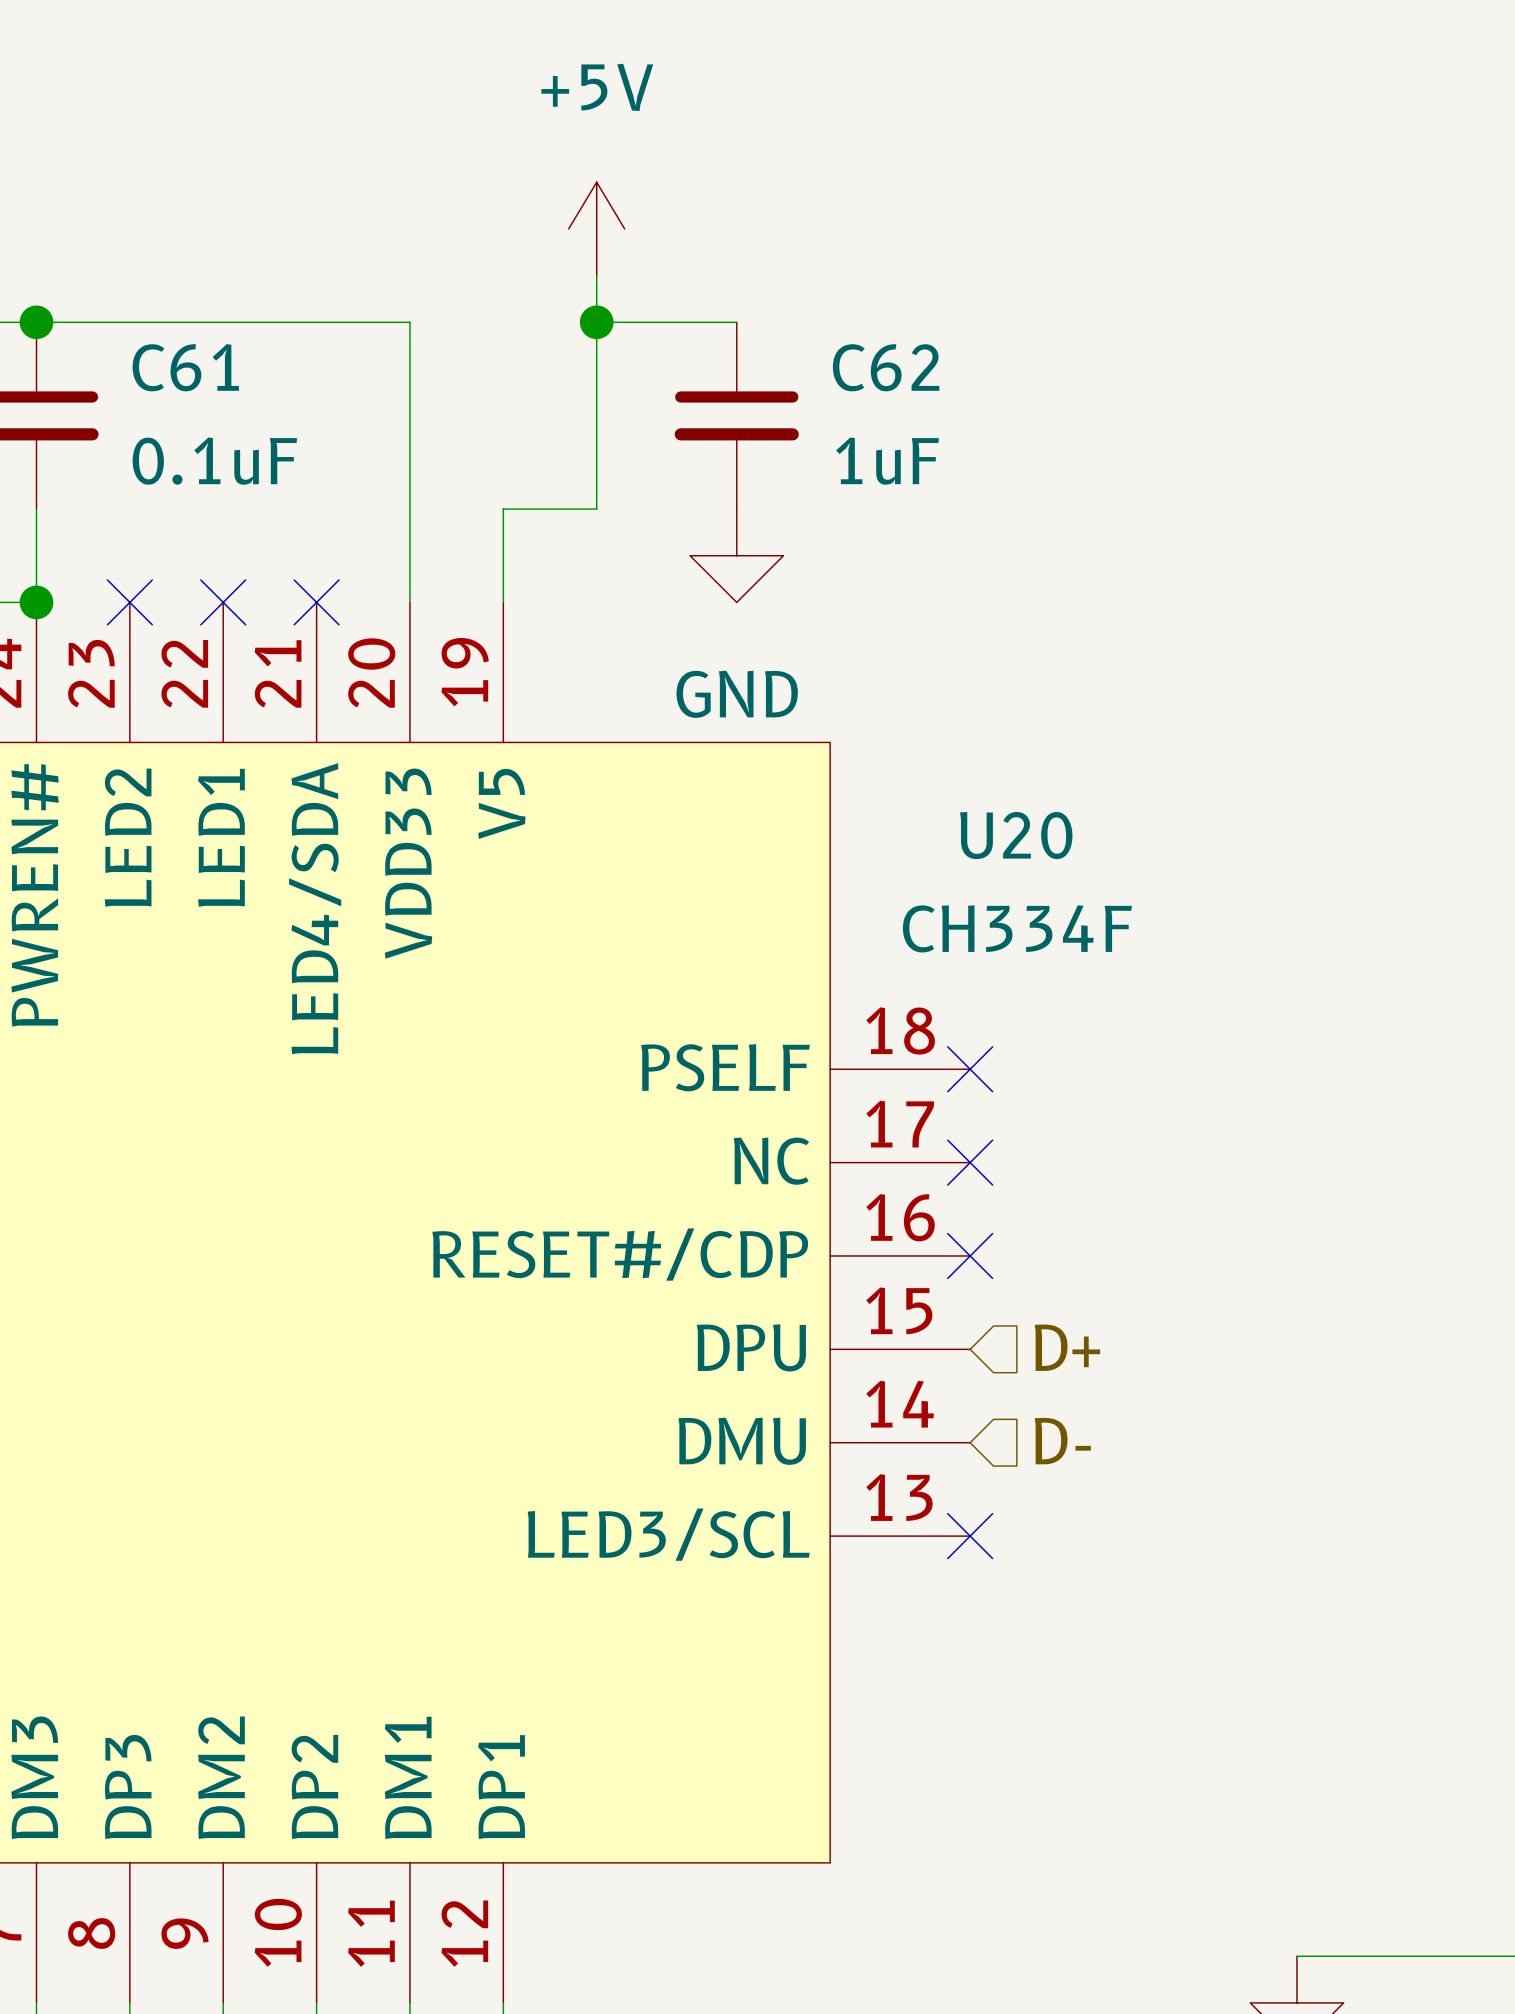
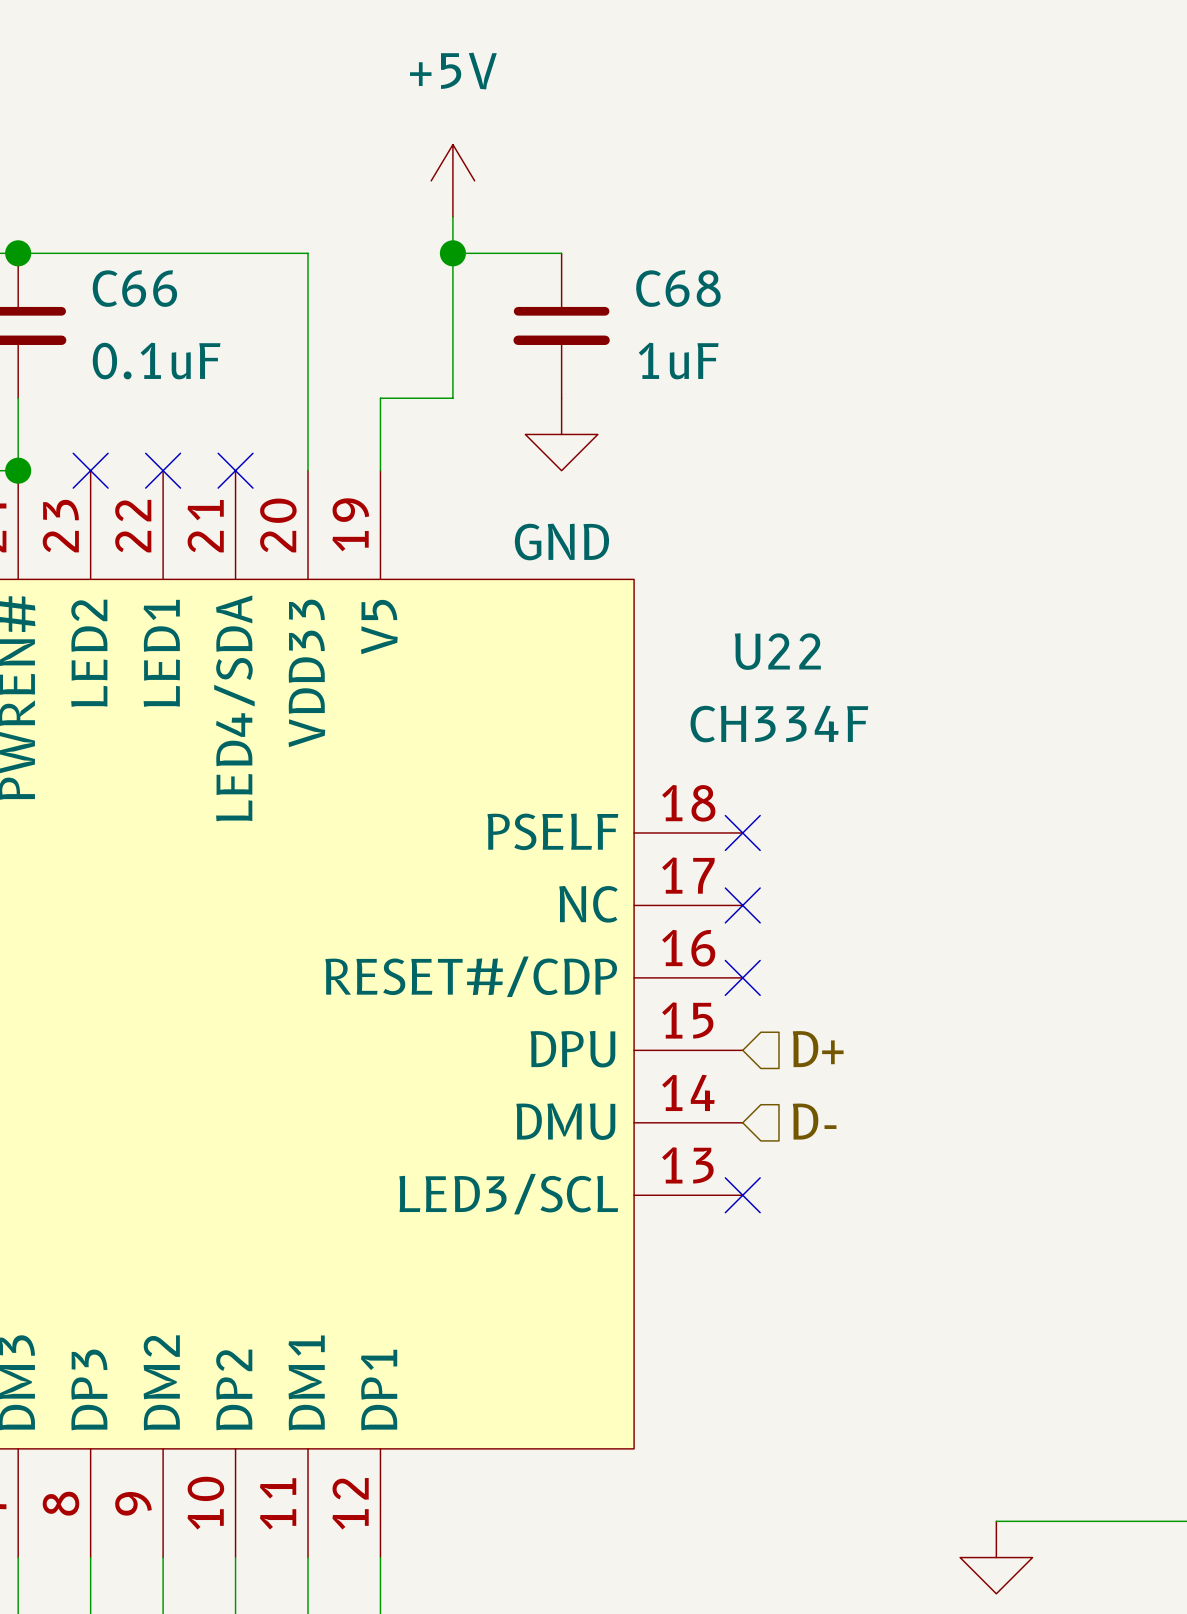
C61 name: C61 (185, 367) -> C66 (134, 288)
C62 name: C62 (886, 367) -> C68 (678, 288)
U20 name: U20 (1016, 835) -> U22 (777, 651)

